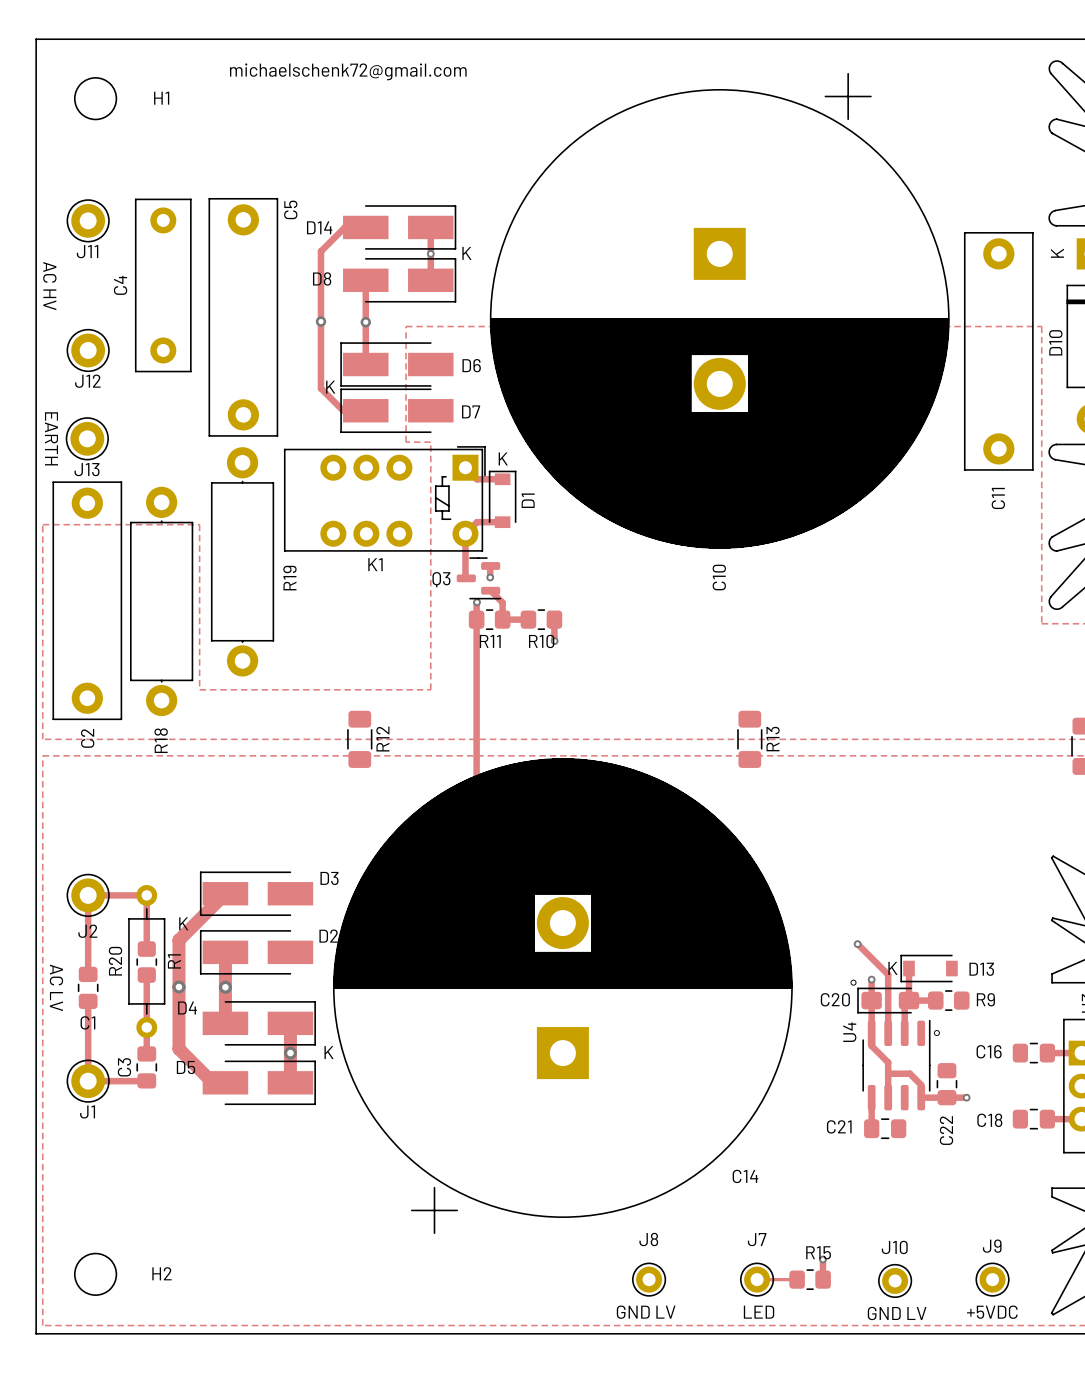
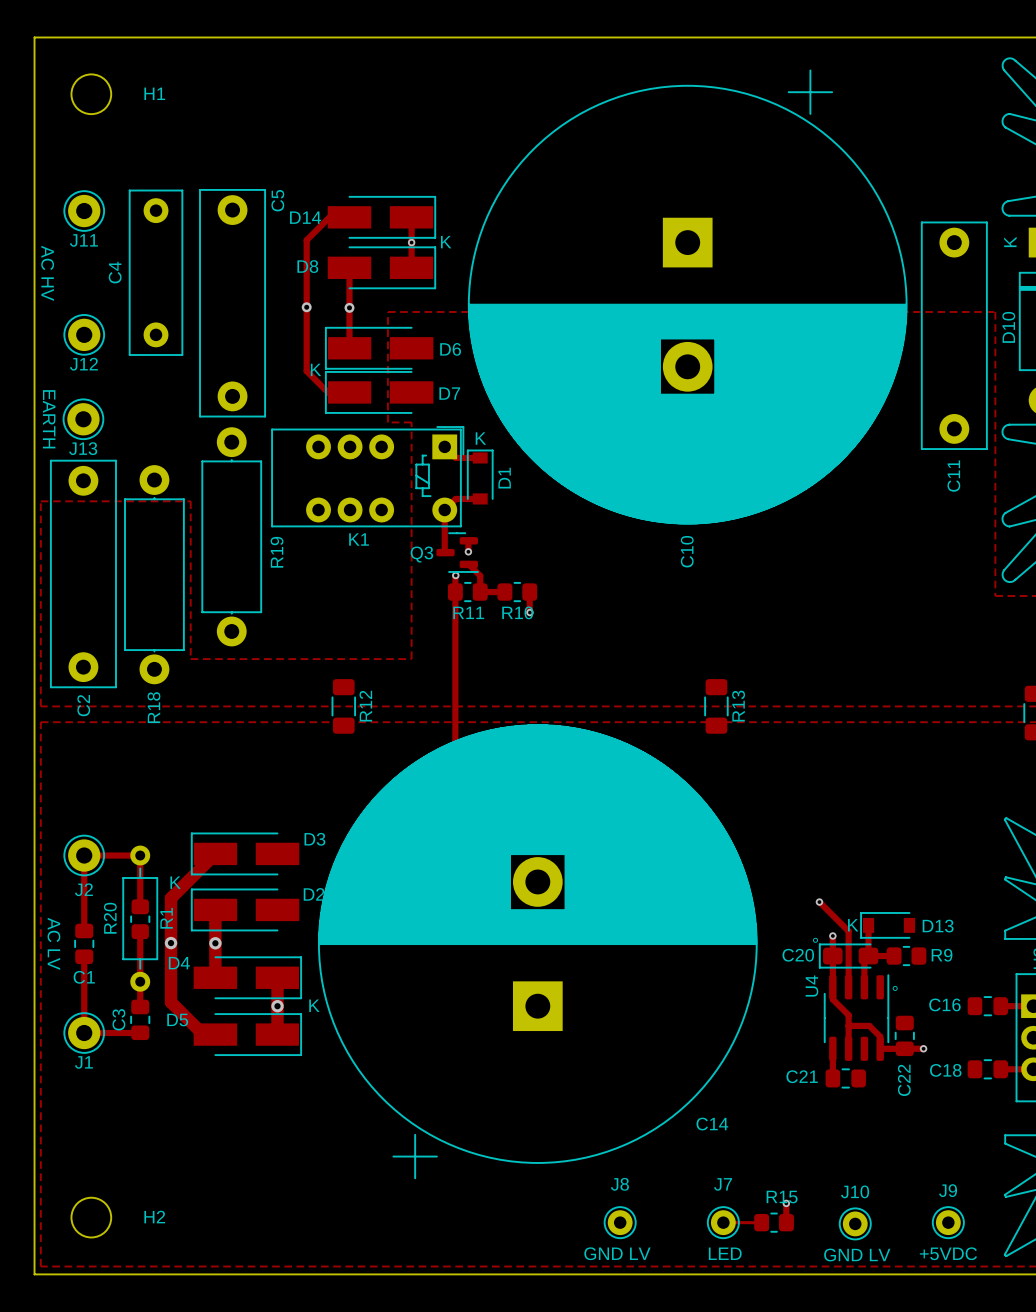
text: michaelschenk72@gmail.com (348, 71) -> none

